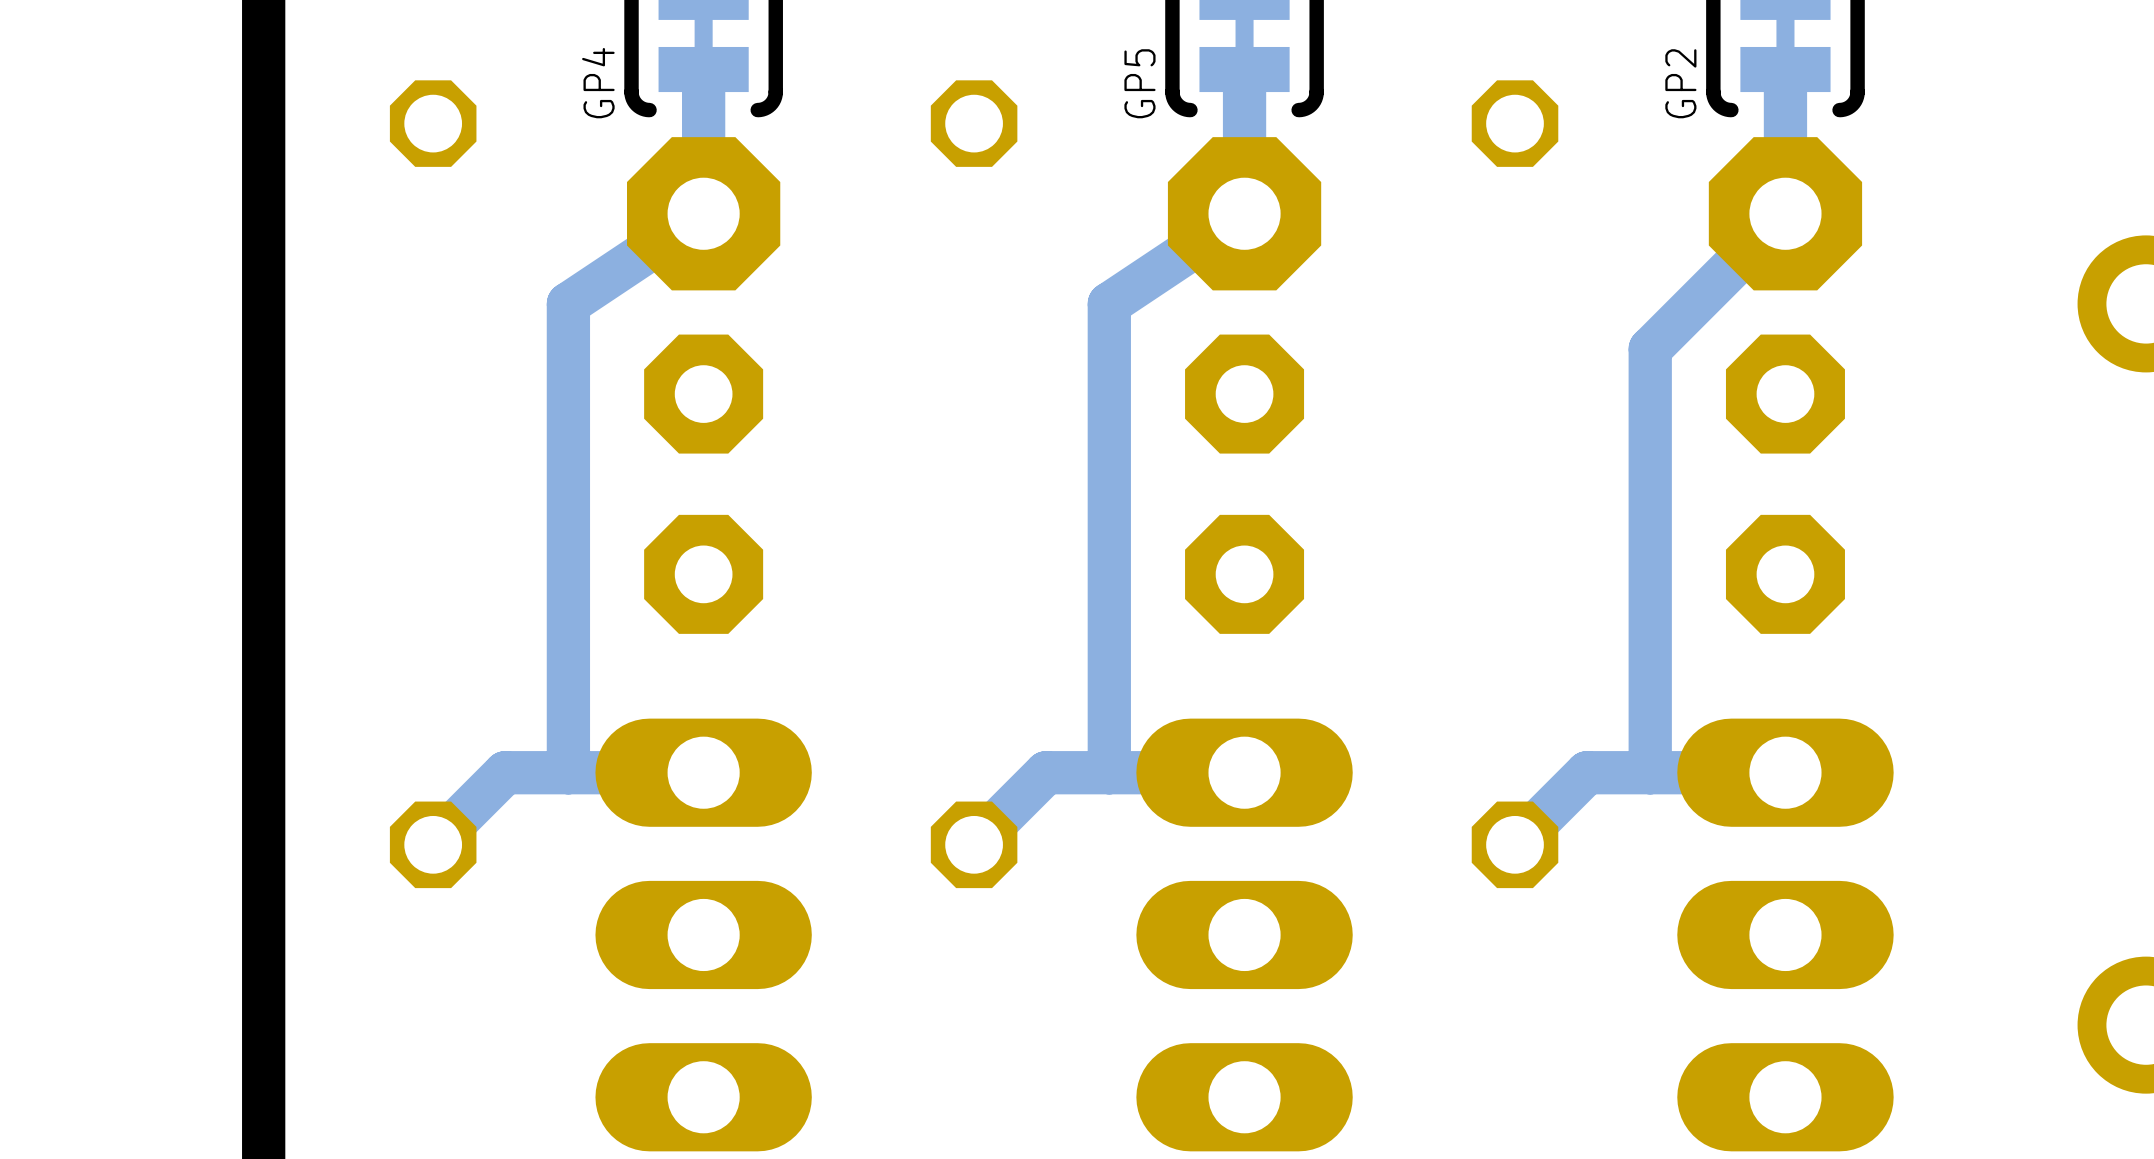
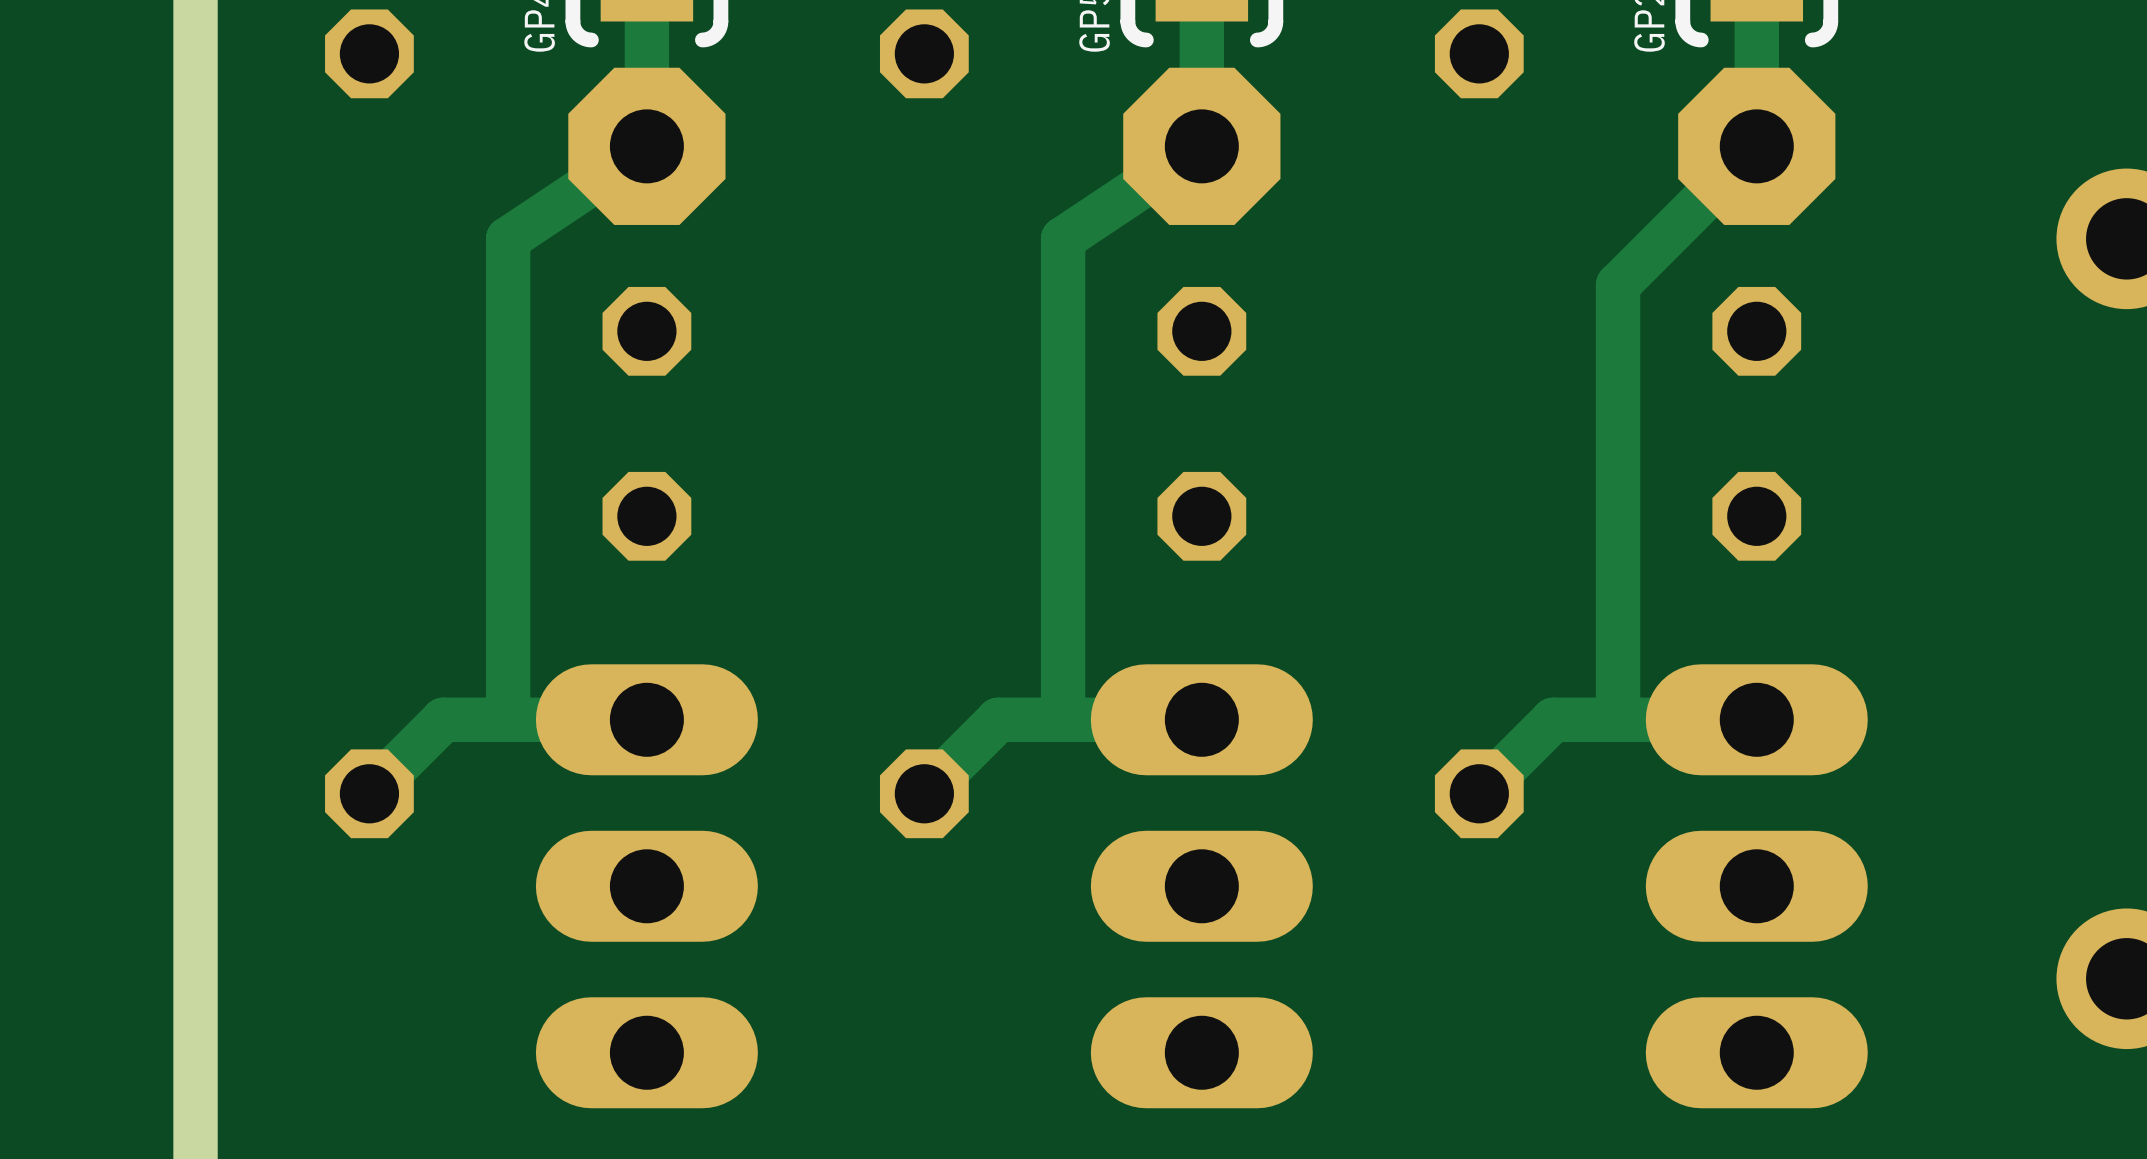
part footprint: [644, 334, 764, 634] -> [602, 286, 692, 561]
part footprint: [1185, 334, 1305, 634] -> [1157, 286, 1247, 561]
part footprint: [1725, 334, 1845, 634] -> [1712, 286, 1802, 561]

